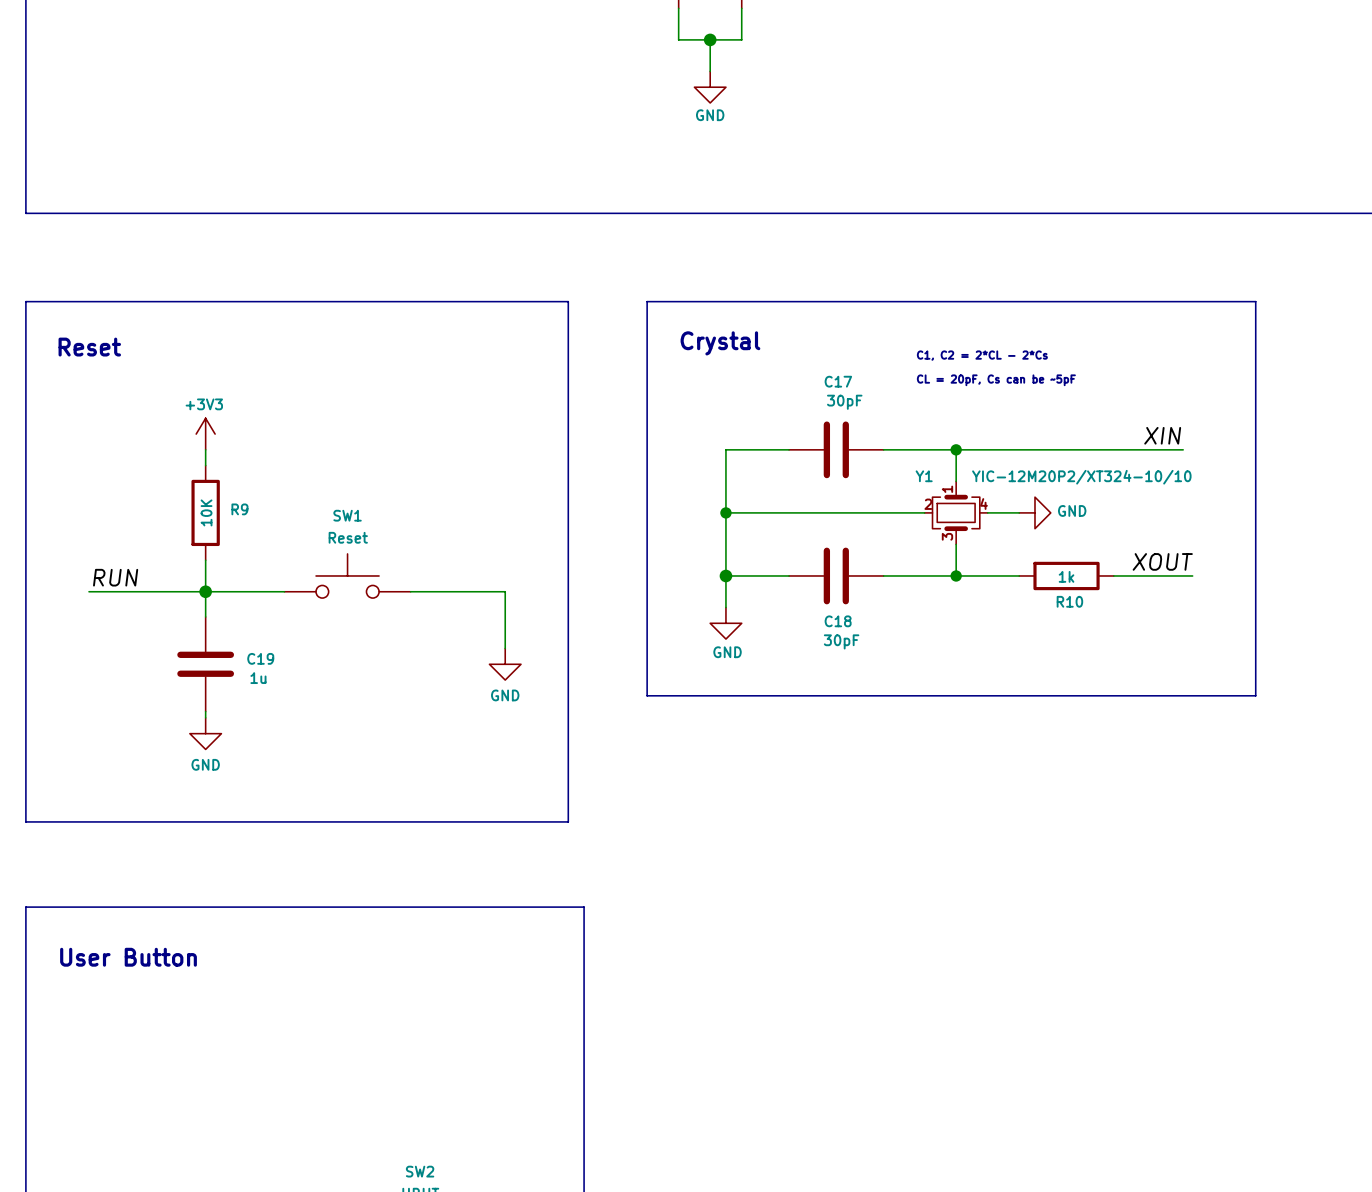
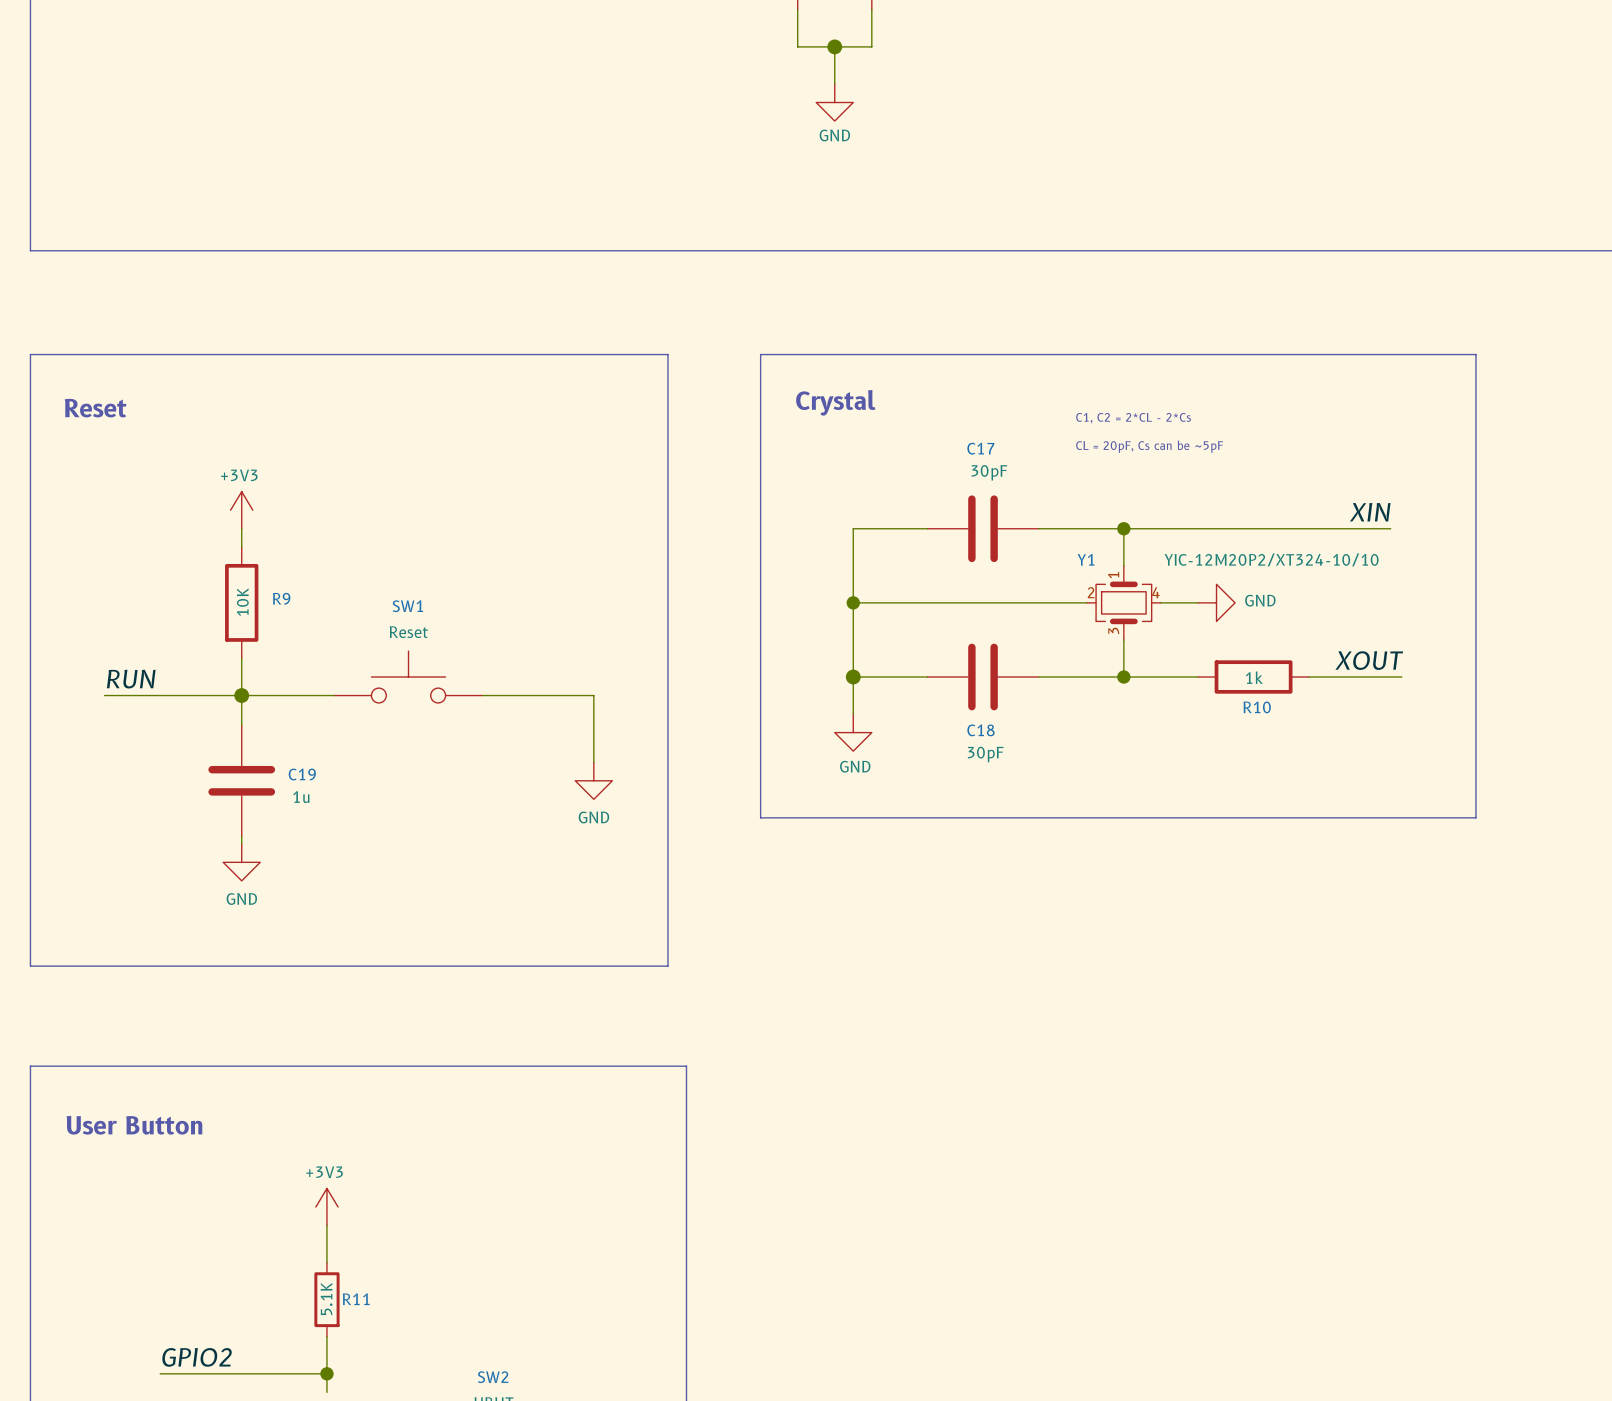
power symbol: none -> +3V3 (326, 1207)
wire: none -> (326, 1225) (326, 1262)
R11: none -> 5.1K (326, 1299)
wire: none -> (326, 1336) (326, 1392)
label: none -> GPIO2 (197, 1357)
wire: none -> (160, 1373) (326, 1373)
junction: none -> (326, 1373)

